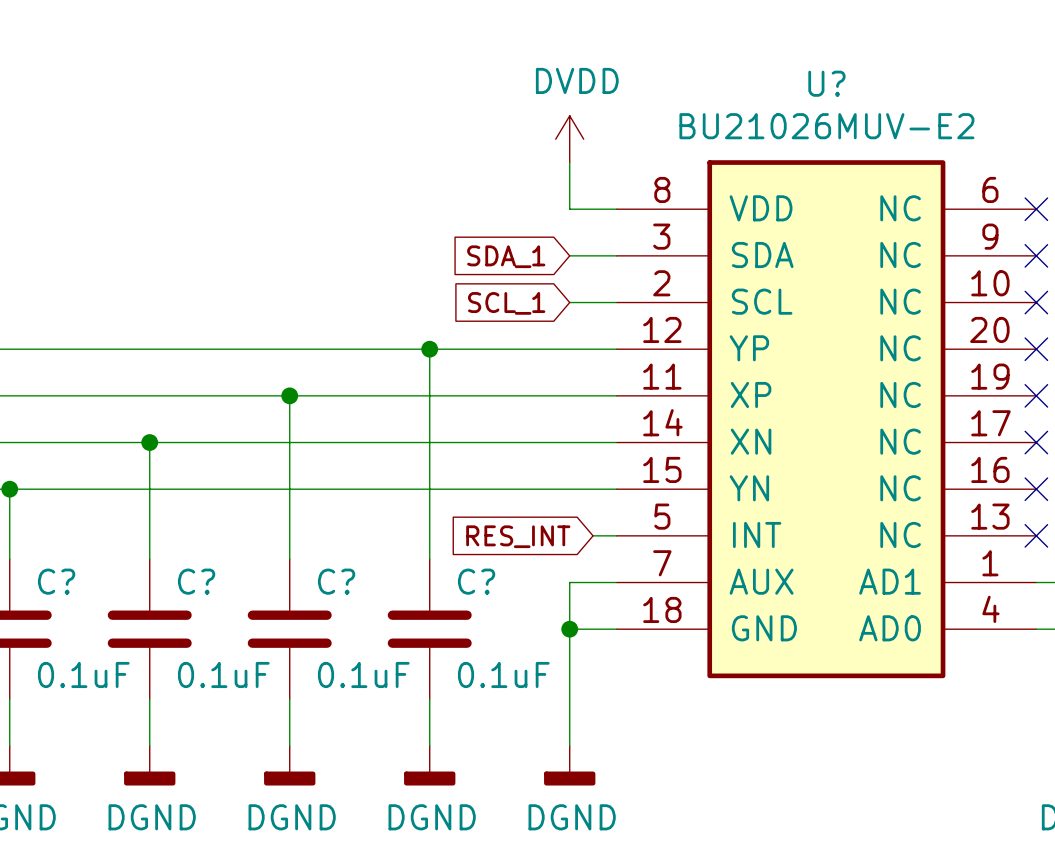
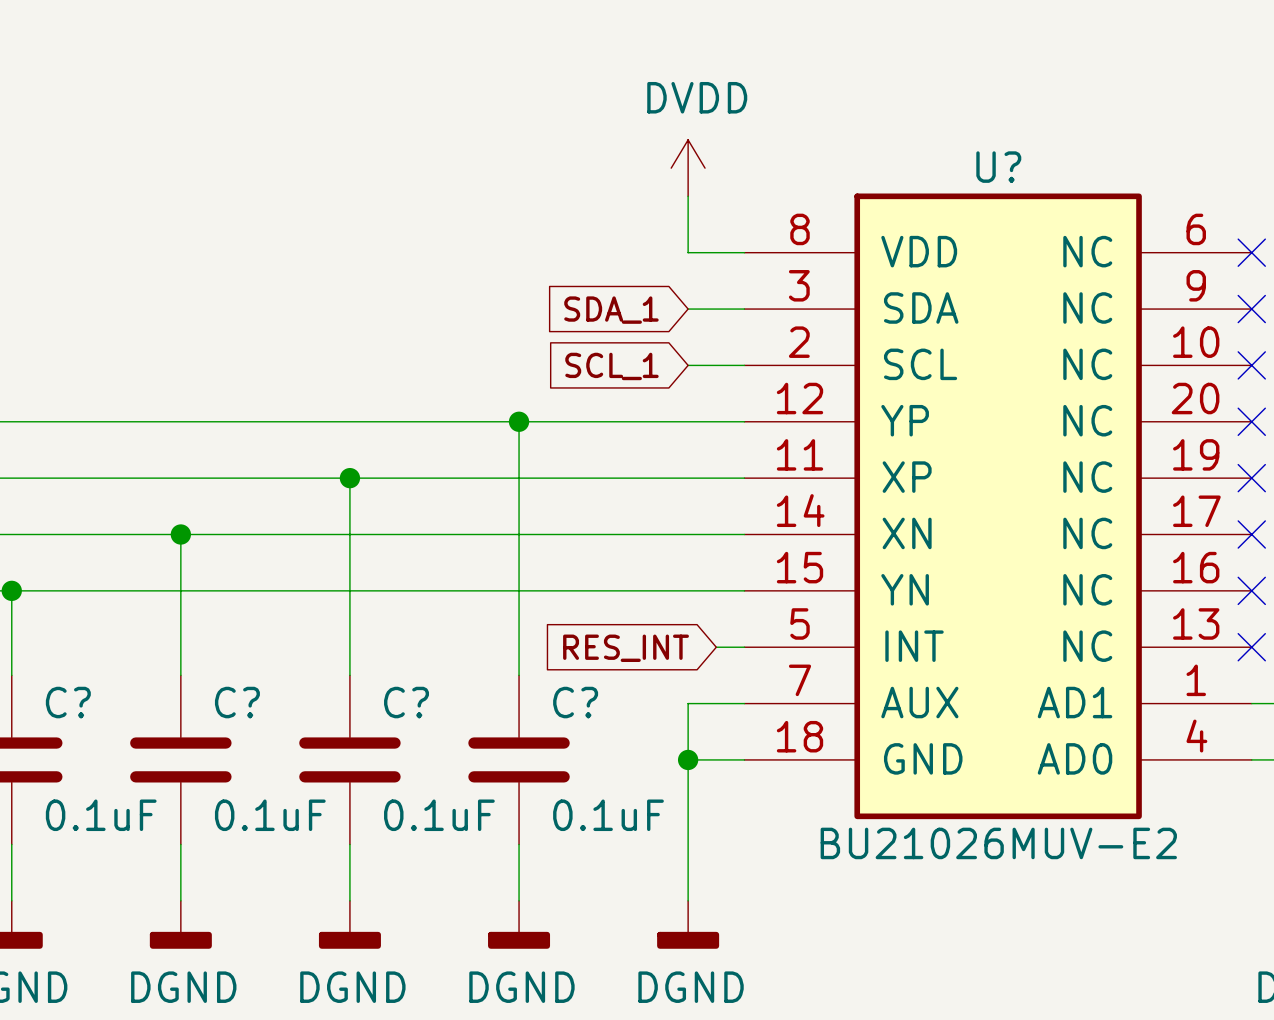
U? name position: U? (826, 83) -> U? (998, 167)
U? value position: BU21026MUV-E2 (826, 126) -> BU21026MUV-E2 (998, 843)

